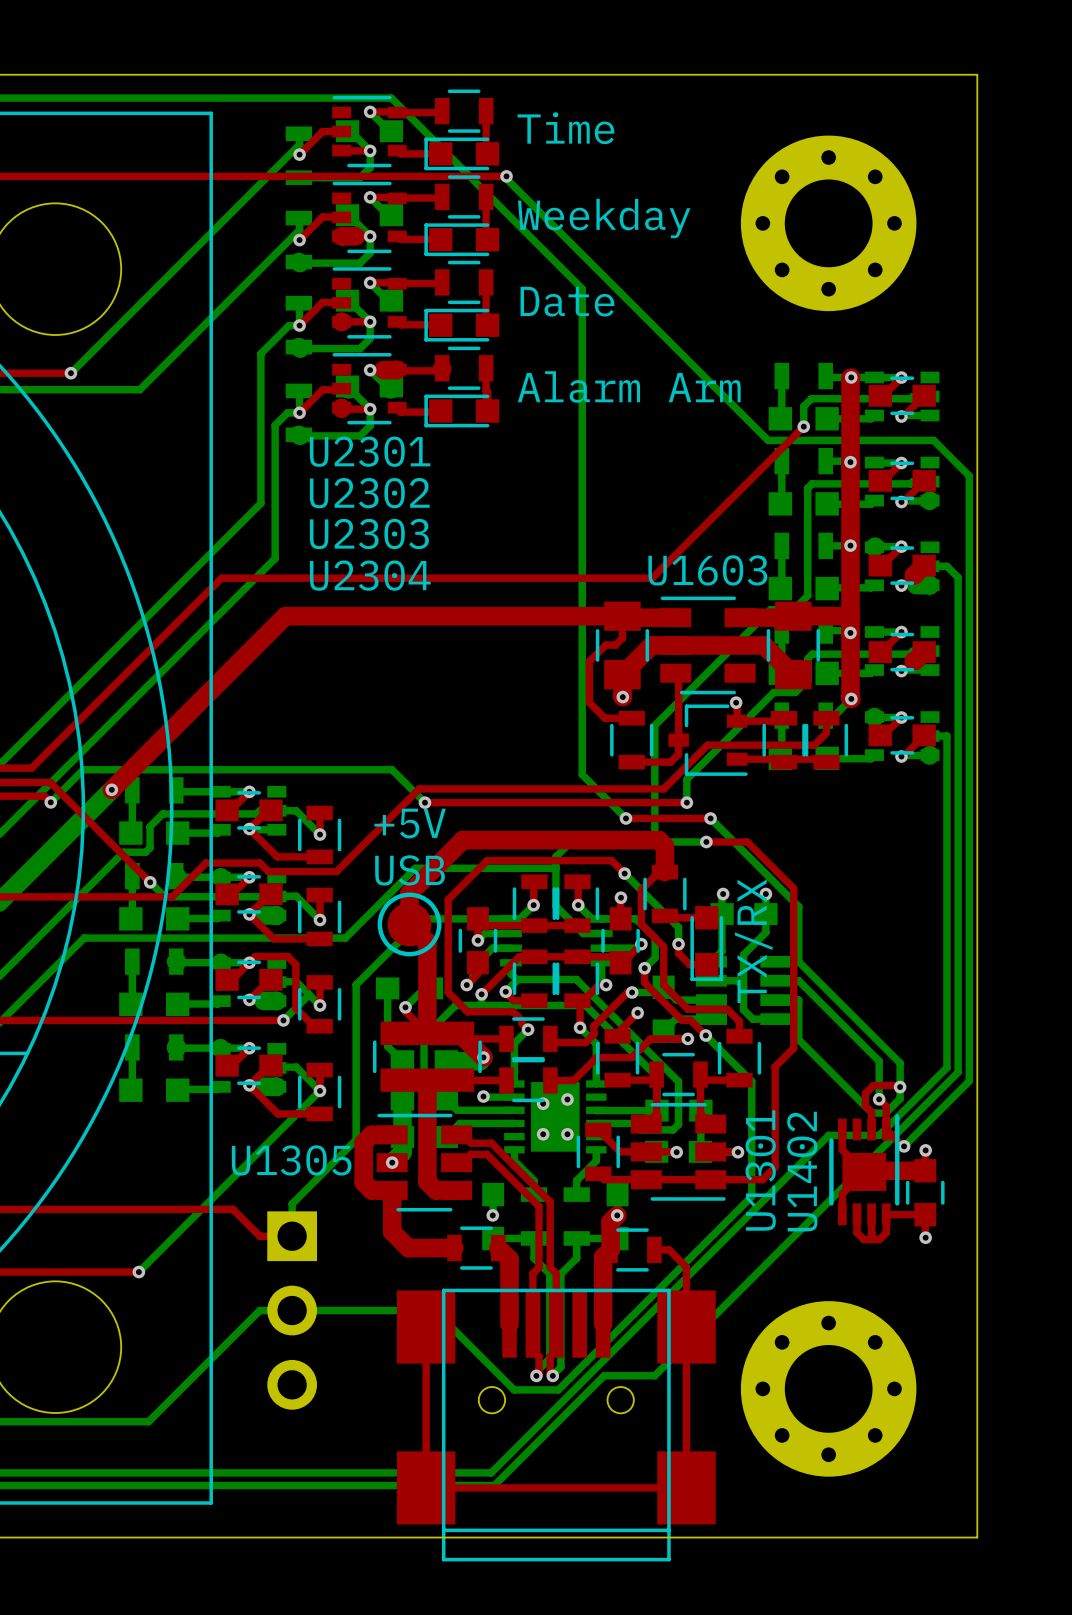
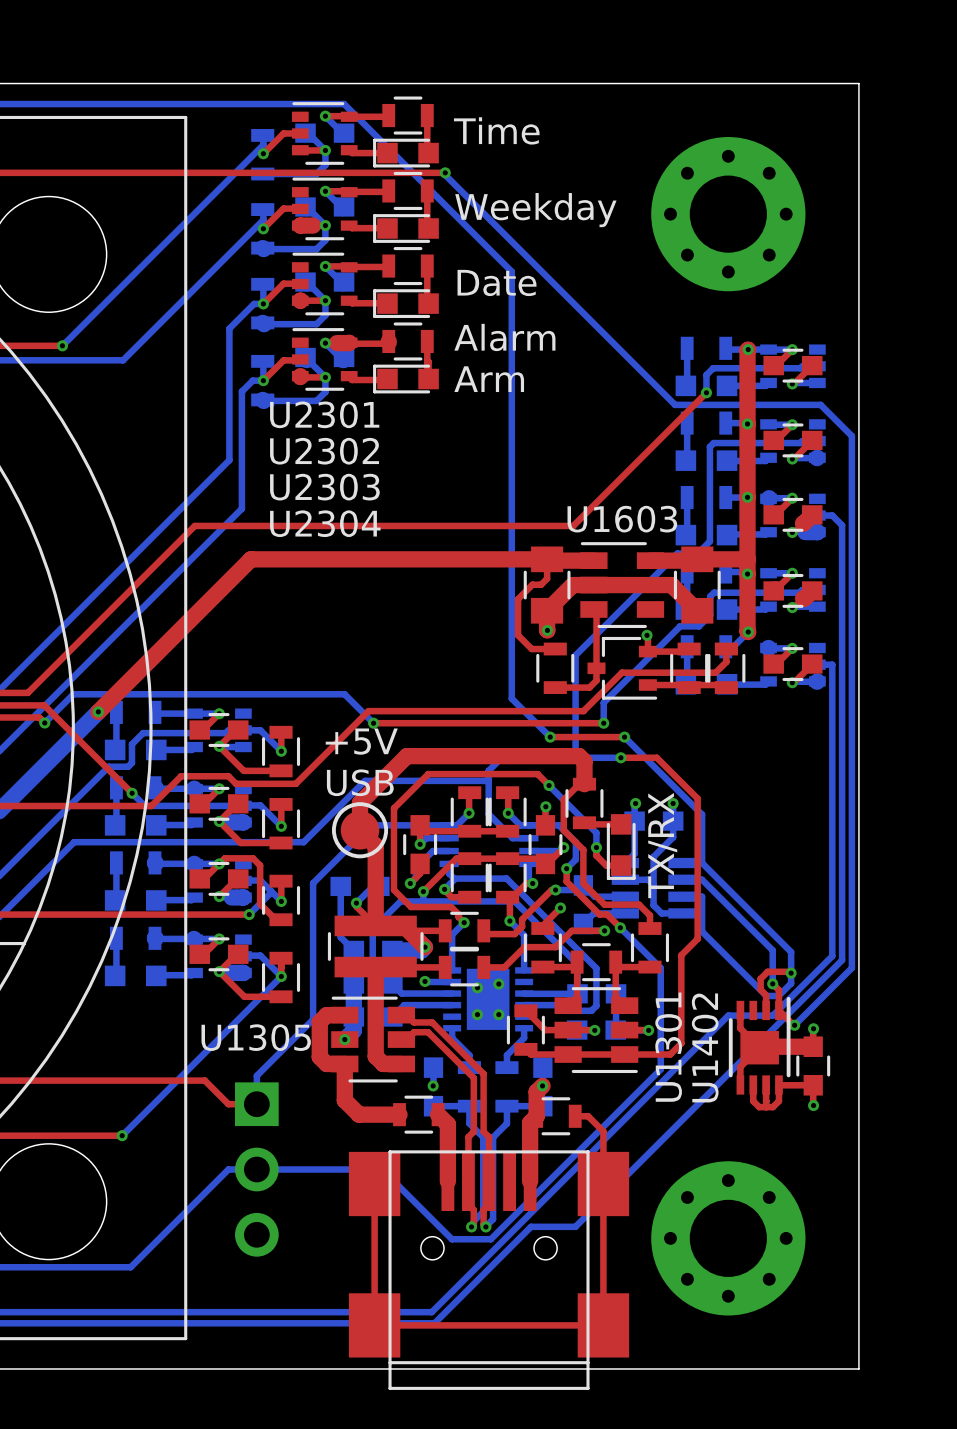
text: Alarm Arm (629, 386) -> Alarm (504, 337)
text: none -> Arm (489, 379)

